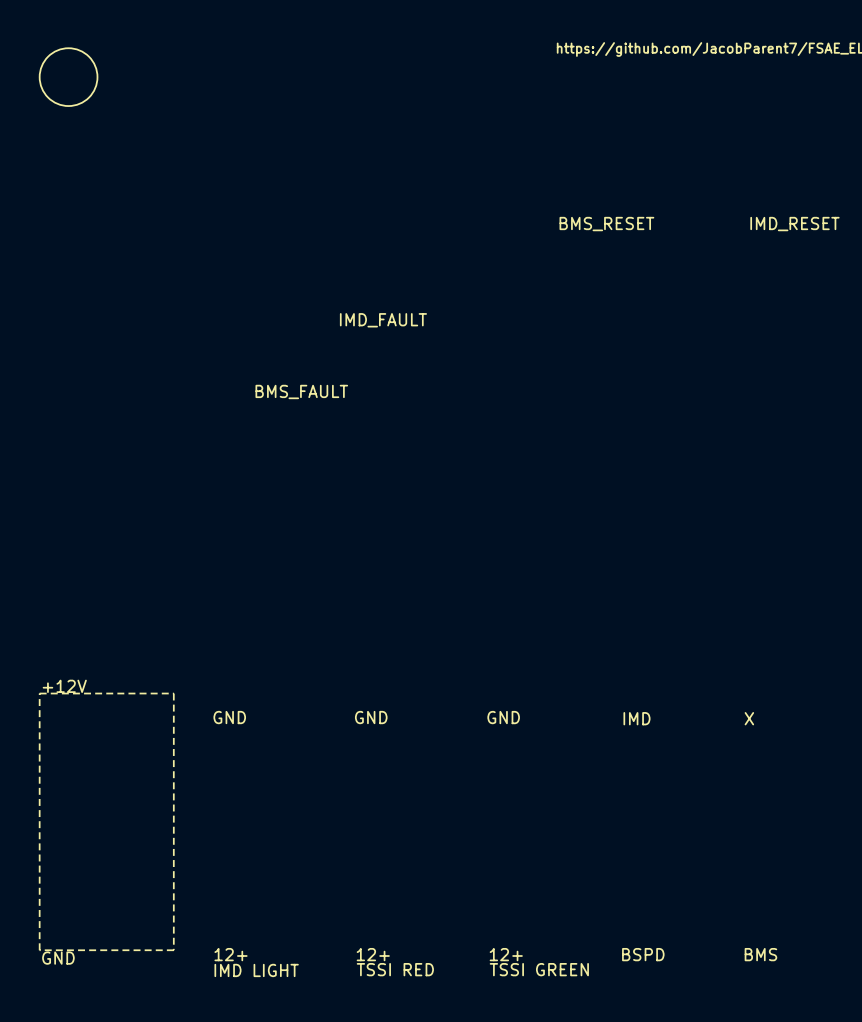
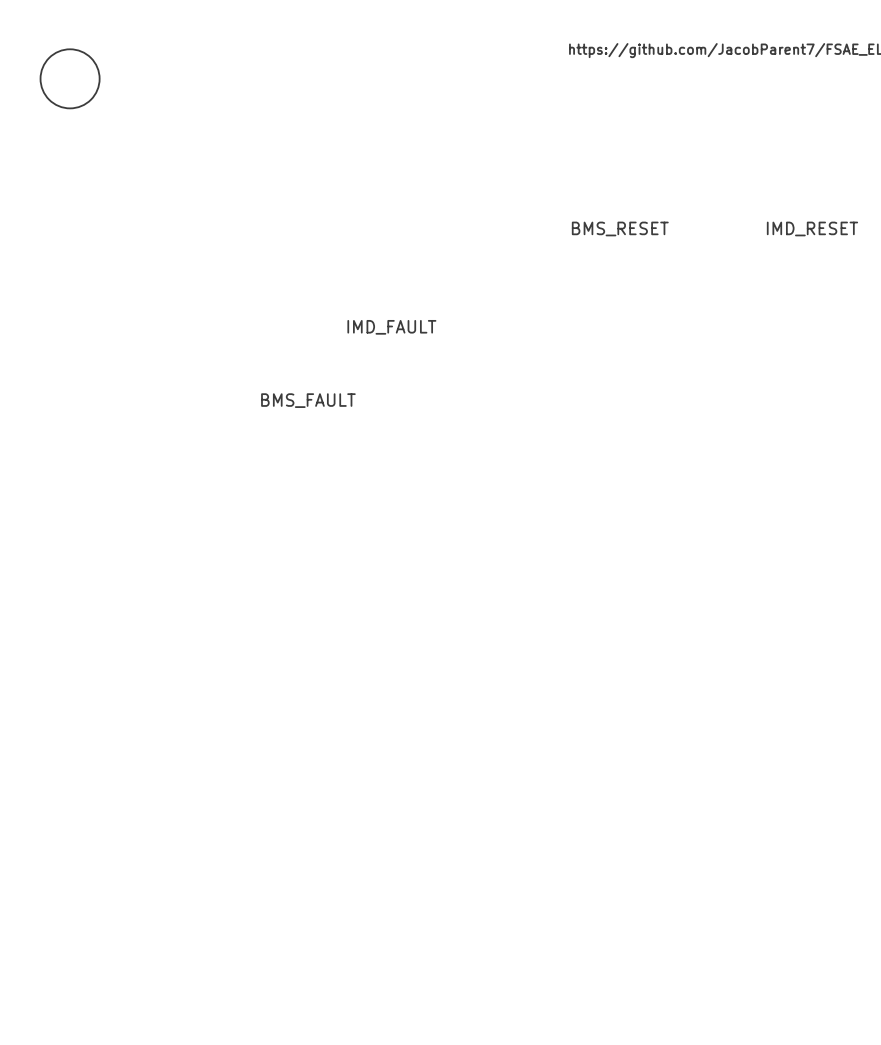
text: +12V (64, 686) -> none
line: (39, 693) (173, 693) (173, 950) (39, 950) (39, 693) -> none
text: GND (229, 717) -> none
text: GND (371, 717) -> none
text: GND (503, 717) -> none
text: IMD (636, 718) -> none
text: X (749, 718) -> none
text: 12+ (231, 954) -> none
text: 12+ (373, 954) -> none
text: 12+ (506, 954) -> none
text: BSPD (643, 954) -> none
text: BMS (760, 954) -> none
text: GND (58, 958) -> none
text: TSSI RED (395, 969) -> none
text: TSSI GREEN (539, 969) -> none
text: IMD LIGHT (256, 970) -> none

